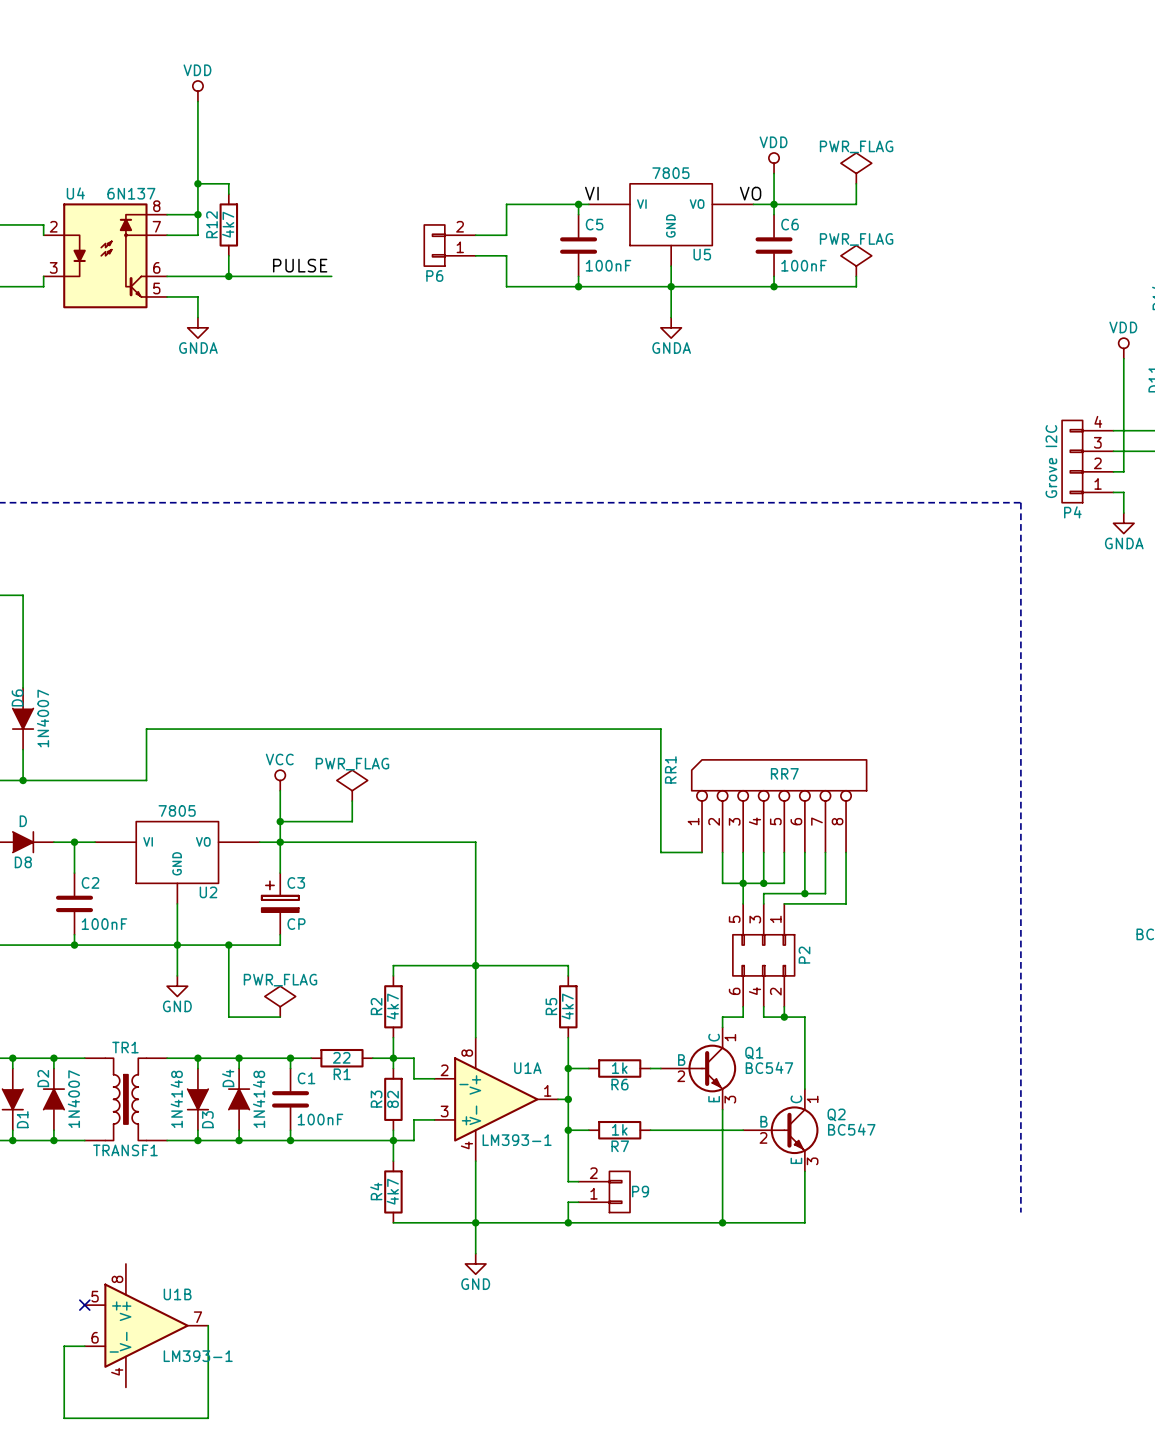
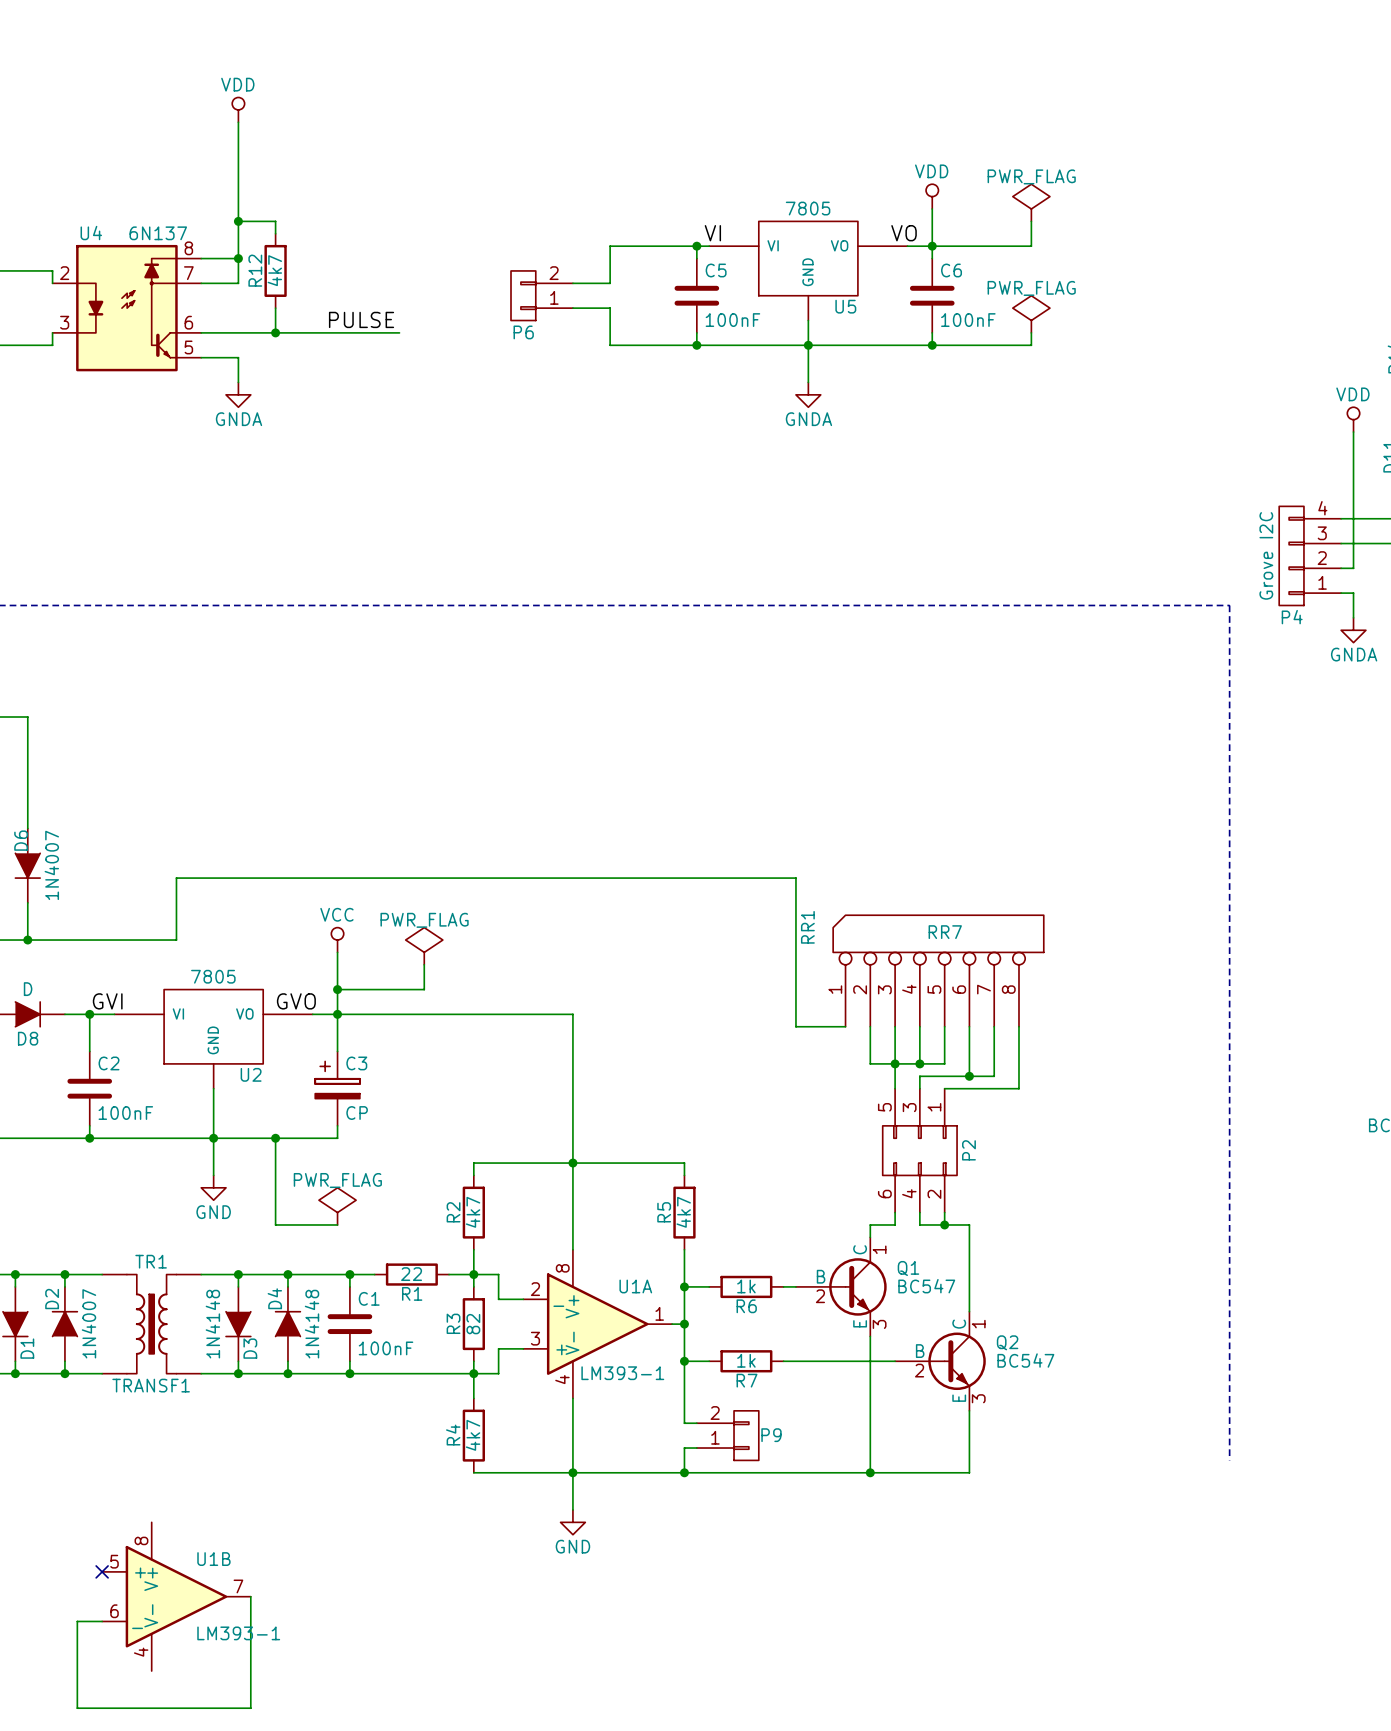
label: none -> GVI (107, 1001)
label: none -> GVO (296, 1001)

